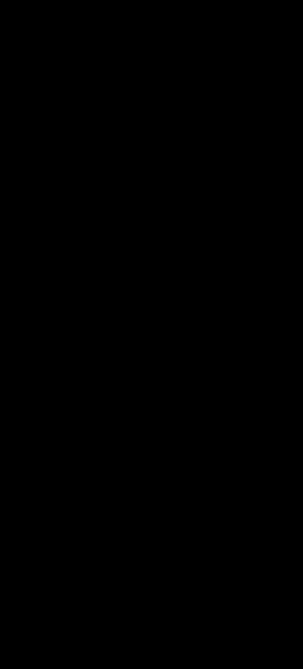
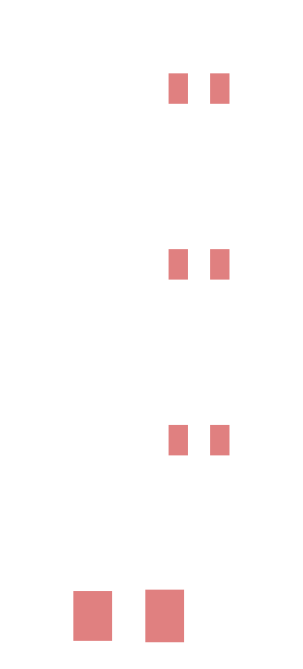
part: none -> (199, 88)
part: none -> (199, 264)
part: none -> (199, 440)
part: none -> (128, 615)

